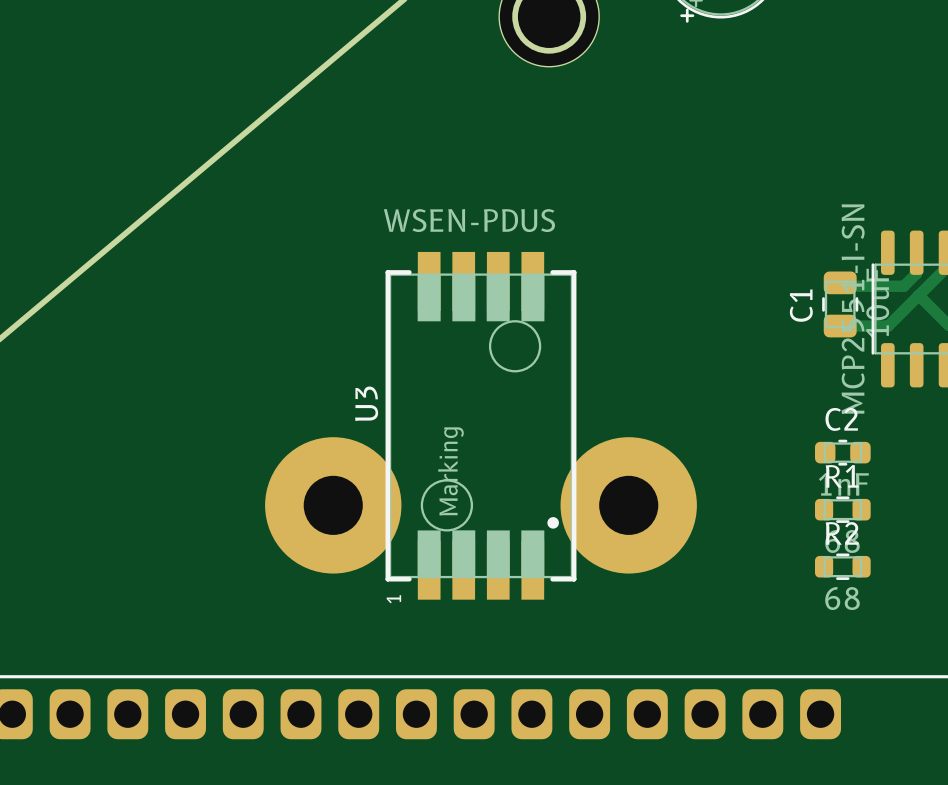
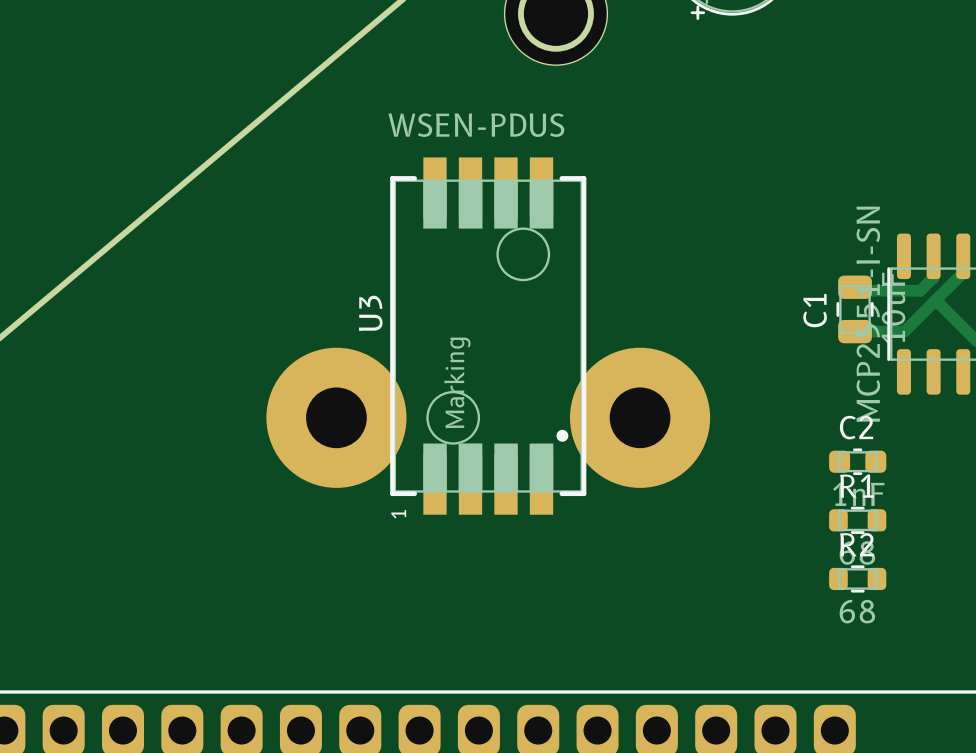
U3 position: (480, 425) -> (488, 336)

